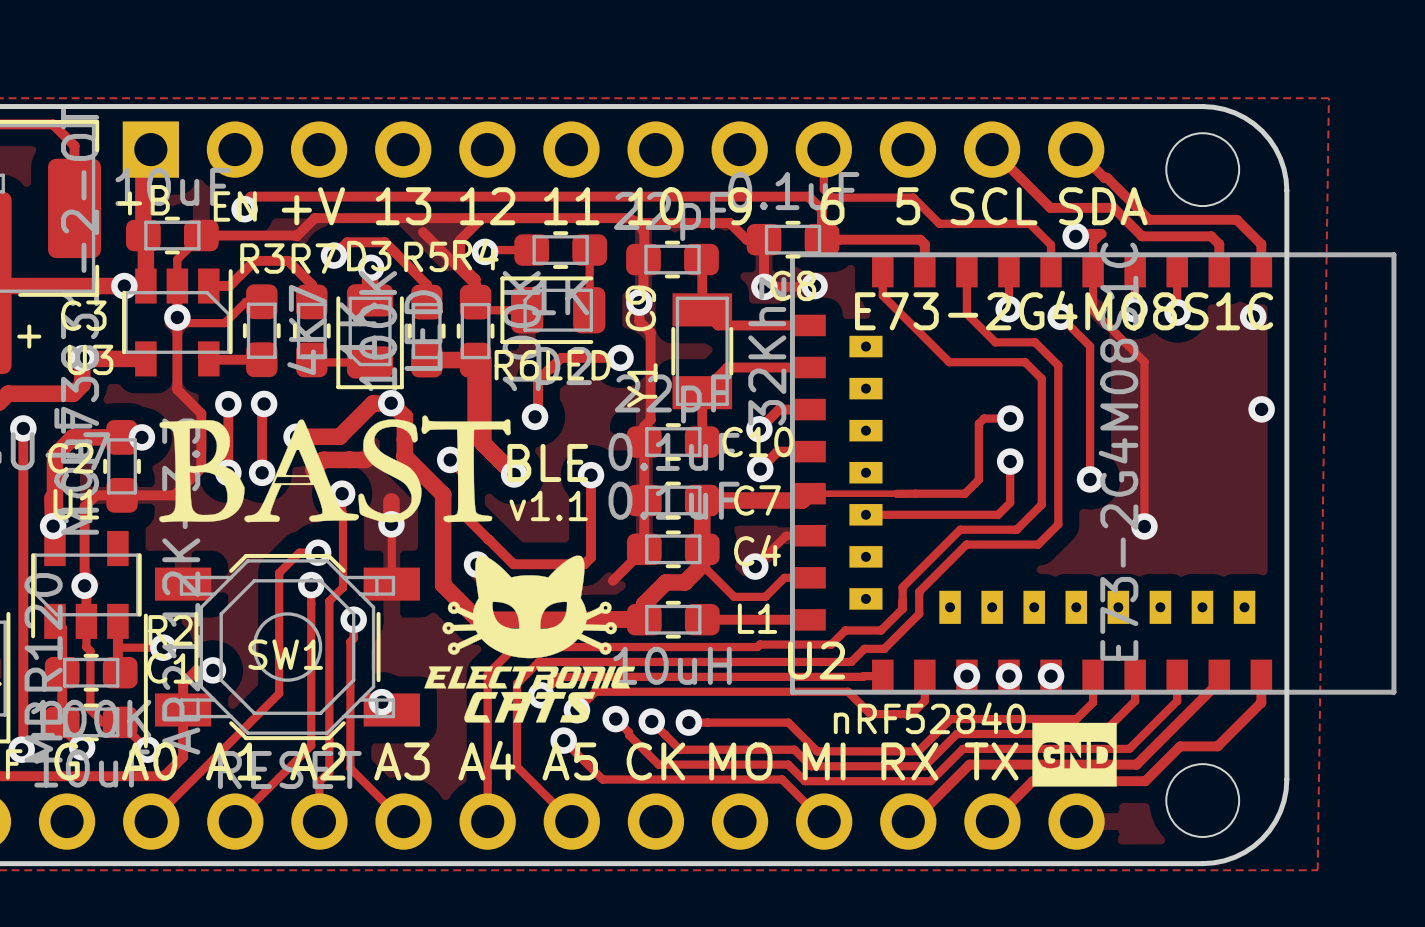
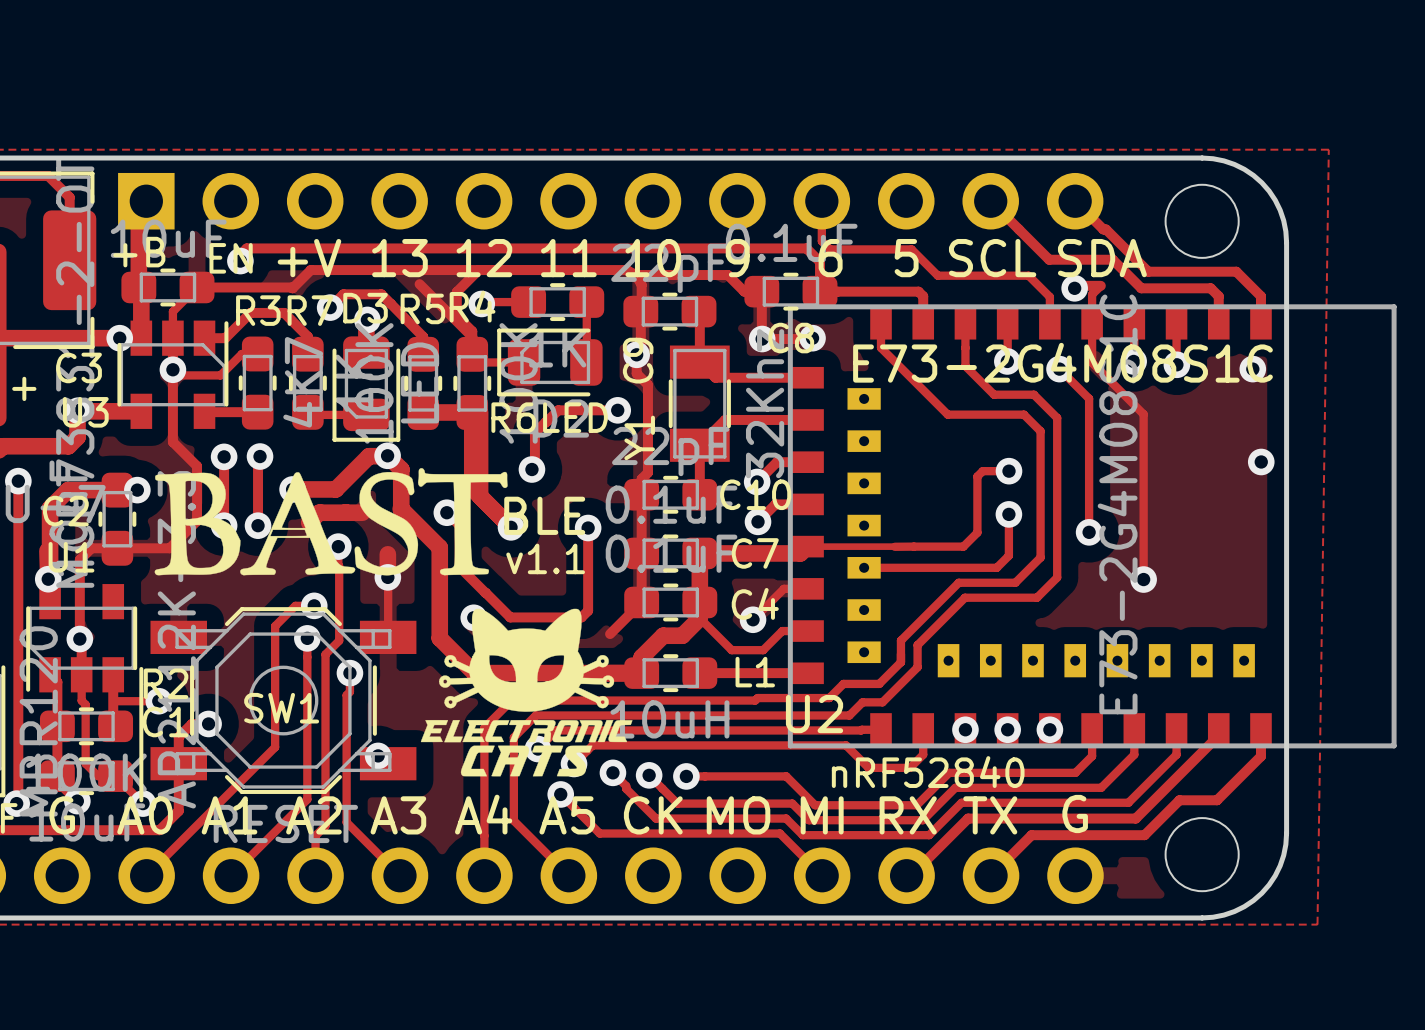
drawing: [1032, 722, 1117, 787] -> none
text: none -> G (1075, 813)

